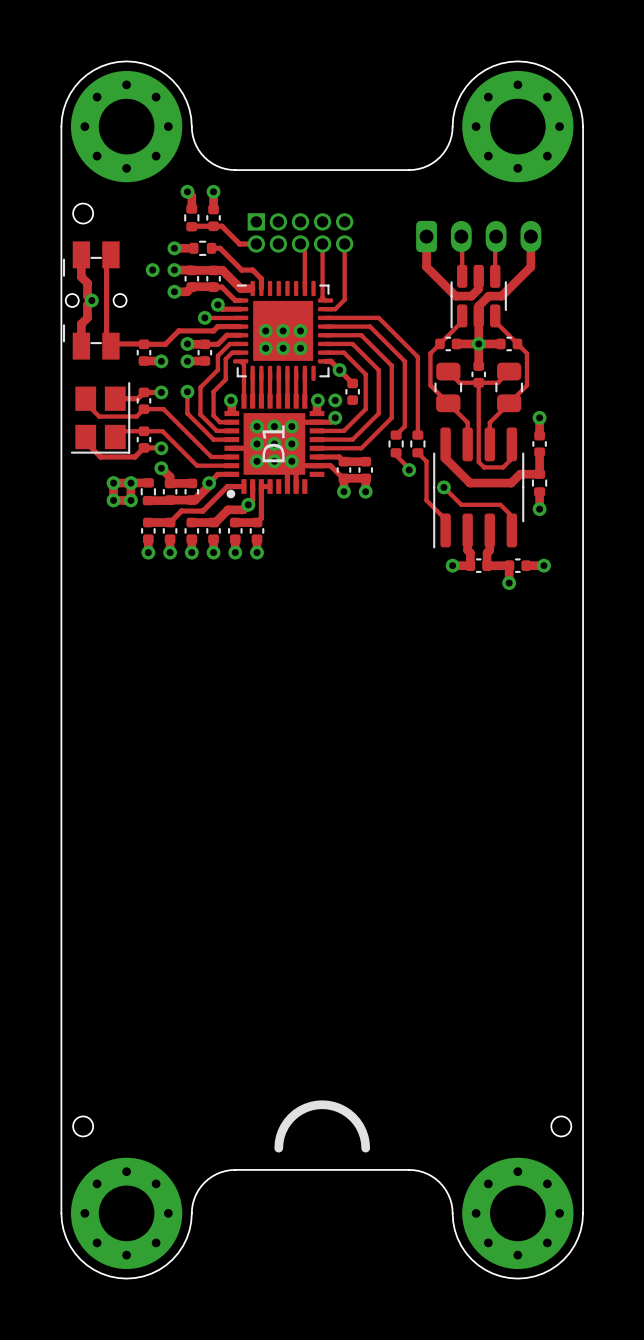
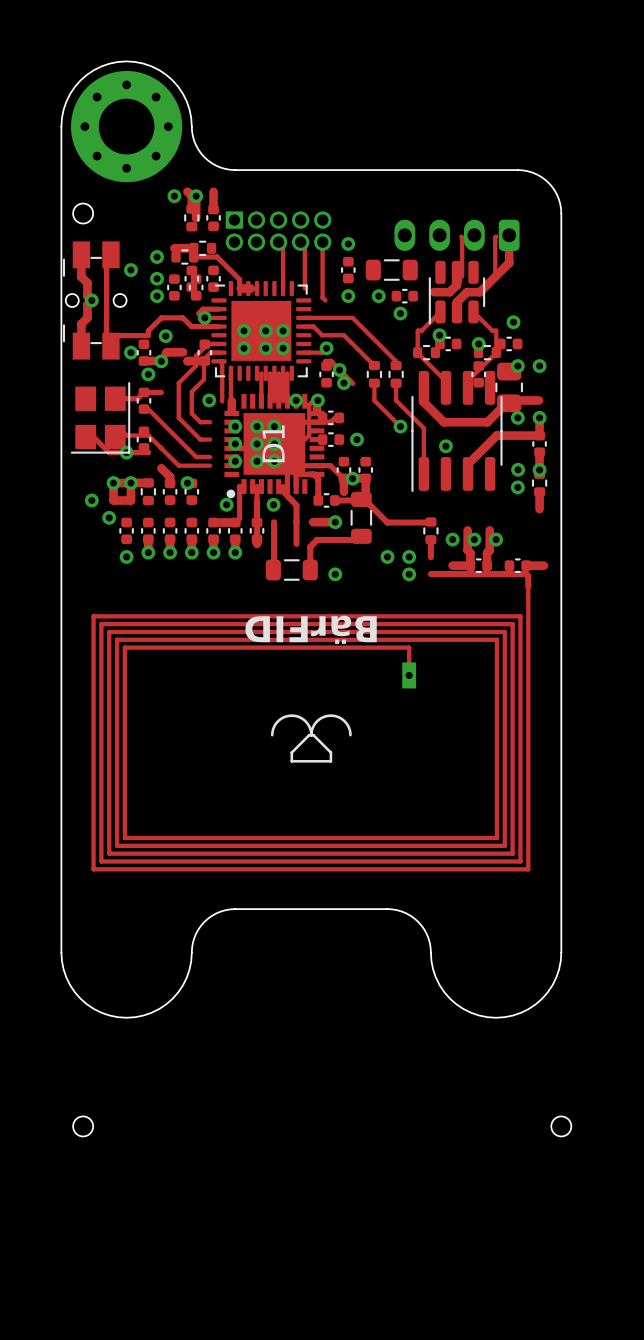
part: (517, 126) -> none
board edge: (409, 170) (428, 165) (443, 153) (450, 140) (454, 109) (461, 94) (478, 74) (492, 66) (517, 61) (542, 66) (563, 80) (578, 101) (583, 126) (583, 1213) (580, 1230) (574, 1245) (557, 1265) (542, 1273) (526, 1278) (500, 1276) (478, 1265) (466, 1253) (454, 1230) (451, 1203) (448, 1194) (436, 1179) (423, 1172) (409, 1169) (235, 1169) (216, 1174) (201, 1186) (192, 1203) (191, 1221) (186, 1238) (178, 1253) (166, 1265) (151, 1273) (135, 1278) (118, 1278) (94, 1269) (80, 1259) (70, 1245) (61, 1221) (61, 952) -> (409, 170) (527, 171) (536, 174) (548, 182) (554, 190) (560, 203) (561, 952) (556, 977) (542, 998) (521, 1012) (504, 1017) (479, 1015) (456, 1004) (444, 992) (433, 969) (429, 942) (426, 933) (418, 921) (406, 913) (387, 909) (230, 909) (212, 915) (198, 929) (192, 942) (191, 961) (186, 977) (172, 998) (151, 1012) (126, 1017) (101, 1012) (80, 998) (66, 977) (61, 952)
via: (187, 191) -> none
via: (213, 191) -> none
via: none -> (174, 196)
track: none -> (196, 196) (196, 218)
via: none -> (196, 196)
track: (191, 226) (221, 226) (239, 243) (256, 243) -> none
part position: (300, 232) -> (278, 231)
track: none -> (509, 235) (509, 262) (480, 292) (467, 292) (456, 302) (456, 311)
track: (426, 236) (426, 266) (455, 296) (471, 296) (478, 288) (478, 276) -> none
part rotation: 0° (478, 236) -> 180° (456, 235)
track: (526, 240) (530, 236) (530, 266) (501, 296) (488, 296) (478, 306) (478, 366) -> none
track: none -> (278, 242) (283, 246) (283, 288)
track: (344, 243) (344, 299) (335, 309) (325, 309) -> none
via: none -> (348, 243)
via: (174, 248) -> none
track: (211, 248) (220, 248) (241, 270) (252, 270) (261, 278) (261, 288) -> none
via: none -> (157, 257)
part: none -> (184, 257)
track: none -> (193, 257) (217, 257) (239, 279) (239, 288)
via: none -> (130, 270)
via: (152, 270) -> none
track: (174, 270) (222, 270) (240, 288) (252, 288) -> none
via: (174, 270) -> none
part: none -> (348, 270)
part: none -> (391, 270)
track: none -> (456, 272) (456, 284) (449, 292) (433, 292)
via: none -> (157, 278)
part: none -> (174, 287)
part: none -> (196, 287)
track: (174, 291) (187, 291) (192, 286) (221, 287) (235, 300) (240, 300) -> none
via: (174, 291) -> none
via: none -> (157, 296)
via: none -> (348, 296)
via: none -> (378, 296)
part: none -> (404, 296)
part position: (478, 296) -> (456, 292)
track: (217, 304) (222, 309) (240, 309) -> none
via: (217, 304) -> none
track: none -> (218, 309) (203, 309) (198, 313)
track: none -> (440, 311) (421, 330) (417, 330)
track: none -> (473, 311) (492, 330) (496, 330)
via: none -> (400, 313)
track: (462, 315) (462, 321) (439, 343) -> none
track: (495, 315) (495, 321) (517, 343) -> none
track: (204, 317) (240, 317) -> none
track: (352, 317) (378, 317) (417, 357) (417, 433) -> (352, 317) (396, 361) (396, 365)
via: none -> (513, 322)
track: (217, 326) (213, 330) (178, 330) (165, 344) (113, 343) (110, 346) -> (217, 326) (191, 326) (182, 317) (161, 317) (148, 330) (148, 335)
track: (218, 326) (240, 326) -> (303, 317) (325, 317)
track: none -> (303, 326) (313, 326) (322, 335) (325, 335)
track: (325, 326) (370, 326) (404, 361) (404, 426) (396, 435) -> none
via: none -> (243, 330)
part position: (283, 330) -> (261, 330)
via: (300, 330) -> none
track: none -> (417, 330) (417, 353) (445, 381)
track: none -> (496, 330) (496, 352) (468, 380) (468, 387)
track: none -> (148, 335) (116, 335) (110, 342)
track: (240, 335) (226, 335) (217, 344) (187, 343) -> none
track: (343, 335) (361, 335) (391, 365) (391, 417) (361, 448) (317, 448) -> none
via: none -> (439, 335)
via: none -> (165, 336)
via: (187, 343) -> none
track: none -> (218, 343) (208, 343) (196, 355) (196, 365) (178, 383) (178, 417) (200, 439) (210, 439)
track: (240, 343) (229, 343) (217, 355) (217, 370) (200, 387) (200, 414) (216, 430) (231, 430) -> none
track: (325, 343) (352, 343) -> (343, 335) (352, 343)
track: (439, 343) (430, 353) (430, 385) (467, 422) (467, 444) -> none
track: (456, 343) (500, 343) -> none
track: (517, 343) (526, 353) (526, 385) (489, 422) (489, 444) -> none
via: none -> (243, 348)
via: (300, 348) -> none
track: none -> (326, 348) (322, 352) (303, 352)
via: none -> (326, 348)
via: none -> (130, 352)
track: none -> (183, 352) (165, 353)
track: none -> (218, 352) (210, 352) (203, 359) (203, 379) (191, 391) (191, 413) (200, 422) (210, 422)
track: (240, 352) (232, 352) (225, 359) (225, 379) (213, 391) (213, 415) (220, 422) (231, 421) -> none
track: (325, 352) (343, 352) (365, 374) (365, 409) (343, 430) (317, 430) -> none
part: none -> (426, 352)
part: none -> (487, 352)
via: (187, 361) -> none
track: none -> (218, 361) (222, 361) (222, 401)
track: (240, 361) (243, 364) (243, 401) -> none
track: (374, 365) (378, 370) (378, 413) (352, 439) (317, 439) -> none
via: none -> (517, 366)
via: none -> (539, 366)
track: (448, 371) (459, 382) (497, 382) (509, 371) -> none
track: (252, 373) (252, 401) -> (230, 373) (230, 401)
track: (296, 373) (296, 401) -> (274, 373) (274, 401)
track: (304, 373) (304, 401) -> (283, 373) (283, 401)
via: none -> (148, 374)
part: none -> (326, 374)
part: none -> (374, 374)
part: none -> (396, 374)
track: (478, 382) (478, 461) (484, 467) (503, 467) (511, 458) (511, 444) -> none
via: none -> (343, 383)
track: none -> (374, 383) (374, 400) (400, 426)
track: none -> (396, 383) (396, 400) (423, 428) (423, 473)
track: none -> (423, 387) (423, 402) (443, 422) (487, 422) (509, 400) (539, 400)
part: (448, 387) -> none
track: (187, 391) (187, 413) (213, 439) (231, 439) -> none
via: (187, 391) -> none
part: (352, 391) -> none
via: (161, 392) -> none
track: (85, 398) (85, 403) (99, 416) (136, 416) (143, 409) (163, 409) (211, 456) (231, 456) -> none
via: none -> (209, 400)
via: (230, 400) -> none
via: none -> (296, 400)
track: none -> (313, 400) (309, 404) (309, 435) (304, 439) (295, 439)
via: (335, 400) -> none
track: none -> (148, 409) (196, 456) (210, 456)
part: none -> (330, 417)
via: (335, 417) -> none
via: none -> (517, 417)
via: none -> (235, 426)
via: (291, 426) -> none
via: none -> (400, 426)
track: none -> (90, 428) (90, 433) (109, 452) (148, 452)
track: none -> (539, 435) (496, 435) (468, 464) (468, 473)
track: (85, 436) (85, 442) (100, 456) (134, 456) (143, 447) (161, 447) -> none
track: (115, 436) (121, 431) (162, 431) (196, 465) -> (119, 428) (126, 435) (148, 435) (178, 465) (196, 465)
part: none -> (330, 439)
via: none -> (357, 439)
via: none -> (235, 443)
via: (291, 443) -> none
part: (396, 443) -> none
part: (417, 443) -> none
track: (445, 444) (445, 458) (470, 483) (511, 483) (520, 474) (539, 474) (539, 470) -> none
via: none -> (445, 446)
via: (161, 448) -> none
via: none -> (126, 452)
track: (396, 452) (396, 455) (409, 468) -> none
track: (417, 452) (426, 461) (426, 500) (445, 519) (445, 530) -> none
track: (317, 456) (339, 456) (343, 461) (365, 461) -> none
via: none -> (235, 461)
via: (291, 461) -> none
track: (210, 465) (231, 465) -> (313, 522) (335, 522)
via: (161, 468) -> none
via: none -> (518, 469)
via: (409, 470) -> none
via: none -> (539, 470)
track: (231, 474) (217, 474) (195, 500) (148, 500) -> none
track: none -> (295, 474) (313, 474) (318, 478) (318, 500)
via: none -> (352, 478)
track: (169, 483) (191, 483) -> none
via: none -> (187, 483)
via: (209, 483) -> none
track: (239, 486) (227, 486) (202, 511) (181, 511) (170, 522) (148, 522) -> none
track: (252, 486) (252, 500) (243, 509) (228, 509) (215, 522) -> (239, 486) (239, 518) (235, 522) (215, 522)
track: none -> (257, 486) (257, 539)
track: (270, 486) (261, 486) (261, 518) (257, 522) (235, 522) -> none
track: none -> (283, 486) (283, 491) (296, 505) (296, 543)
track: (443, 487) (461, 504) (500, 504) (511, 516) (511, 530) -> none
via: (443, 487) -> none
part position: (478, 487) -> (456, 431)
via: none -> (517, 487)
via: (343, 491) -> none
via: (365, 491) -> none
via: none -> (91, 500)
via: (113, 500) -> none
via: (130, 500) -> none
part: none -> (326, 500)
track: none -> (334, 500) (365, 500) (387, 522) (430, 522)
via: none -> (226, 504)
via: (248, 504) -> none
via: none -> (273, 504)
via: (539, 509) -> none
via: none -> (109, 517)
part: none -> (361, 517)
track: (191, 522) (213, 522) -> none
track: none -> (274, 522) (273, 570)
via: none -> (335, 522)
part: none -> (126, 530)
part: none -> (430, 530)
track: none -> (361, 536) (357, 539) (317, 539) (310, 546) (310, 570)
track: none -> (430, 539) (430, 557)
via: none -> (452, 539)
via: none -> (474, 539)
via: none -> (496, 539)
via: (257, 552) -> none
via: none -> (126, 556)
via: none -> (387, 556)
via: none -> (409, 556)
via: (452, 565) -> none
track: (487, 565) (509, 565) (509, 583) -> none
via: (543, 565) -> none
part: none -> (291, 570)
via: none -> (335, 574)
via: none -> (409, 574)
track: none -> (430, 574) (526, 574) (528, 576) (528, 586)
via: (509, 583) -> none
text: none -> BärFID (311, 629)
part: none -> (310, 722)
line: none -> (272, 735) (277, 721) (291, 715) (305, 721) (311, 735) (312, 727) (319, 719) (325, 716) (335, 716) (346, 723) (350, 735)
line: none -> (309, 735) (291, 752) (291, 761) (330, 761) (330, 752) (313, 735) (309, 735)
line: (278, 1148) (282, 1131) (291, 1117) (305, 1108) (322, 1104) (338, 1108) (352, 1117) (362, 1131) (365, 1148) -> none
part: (126, 1213) -> none
part: (517, 1213) -> none

